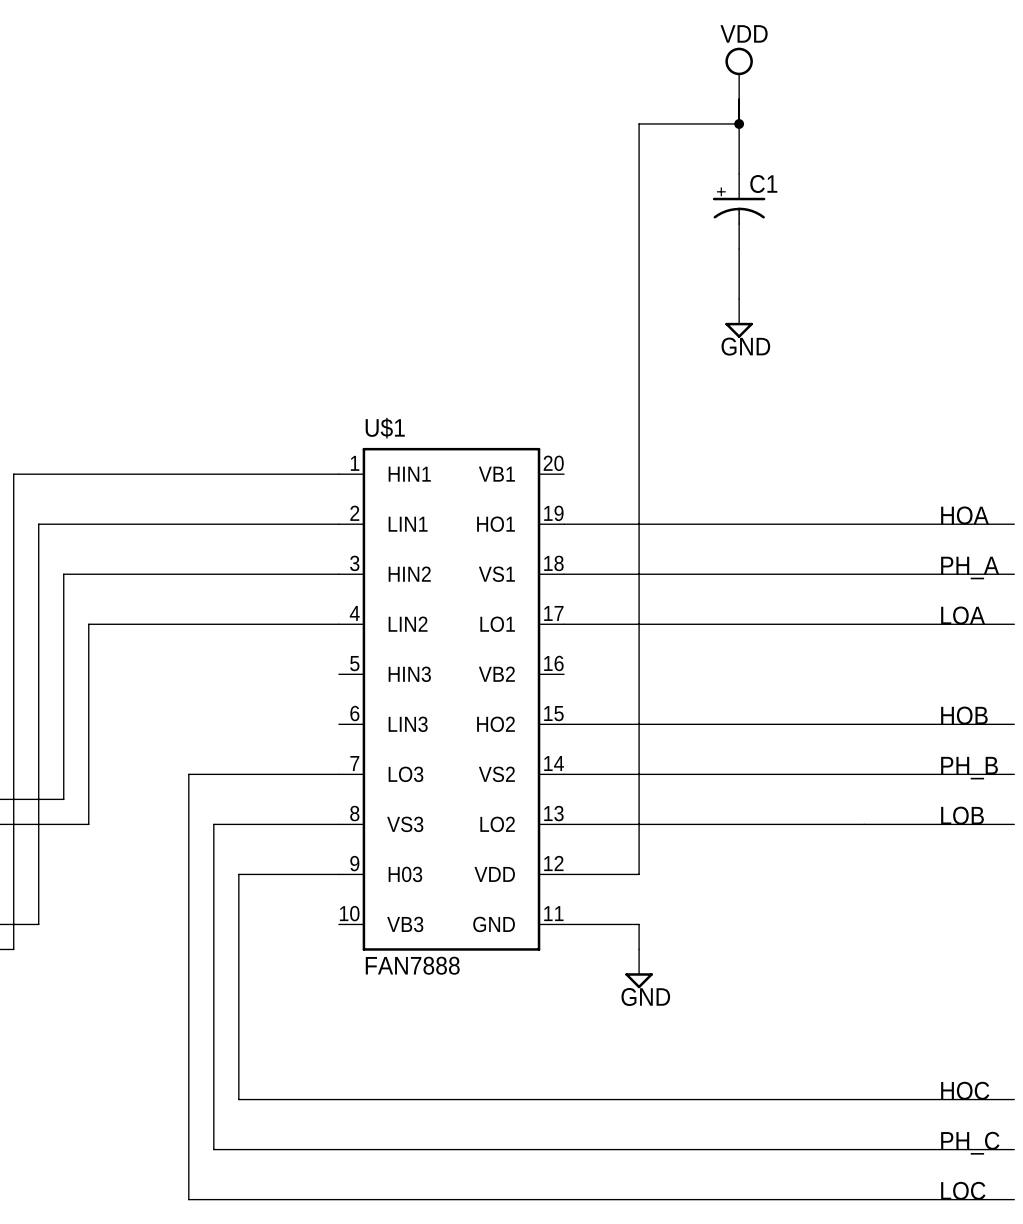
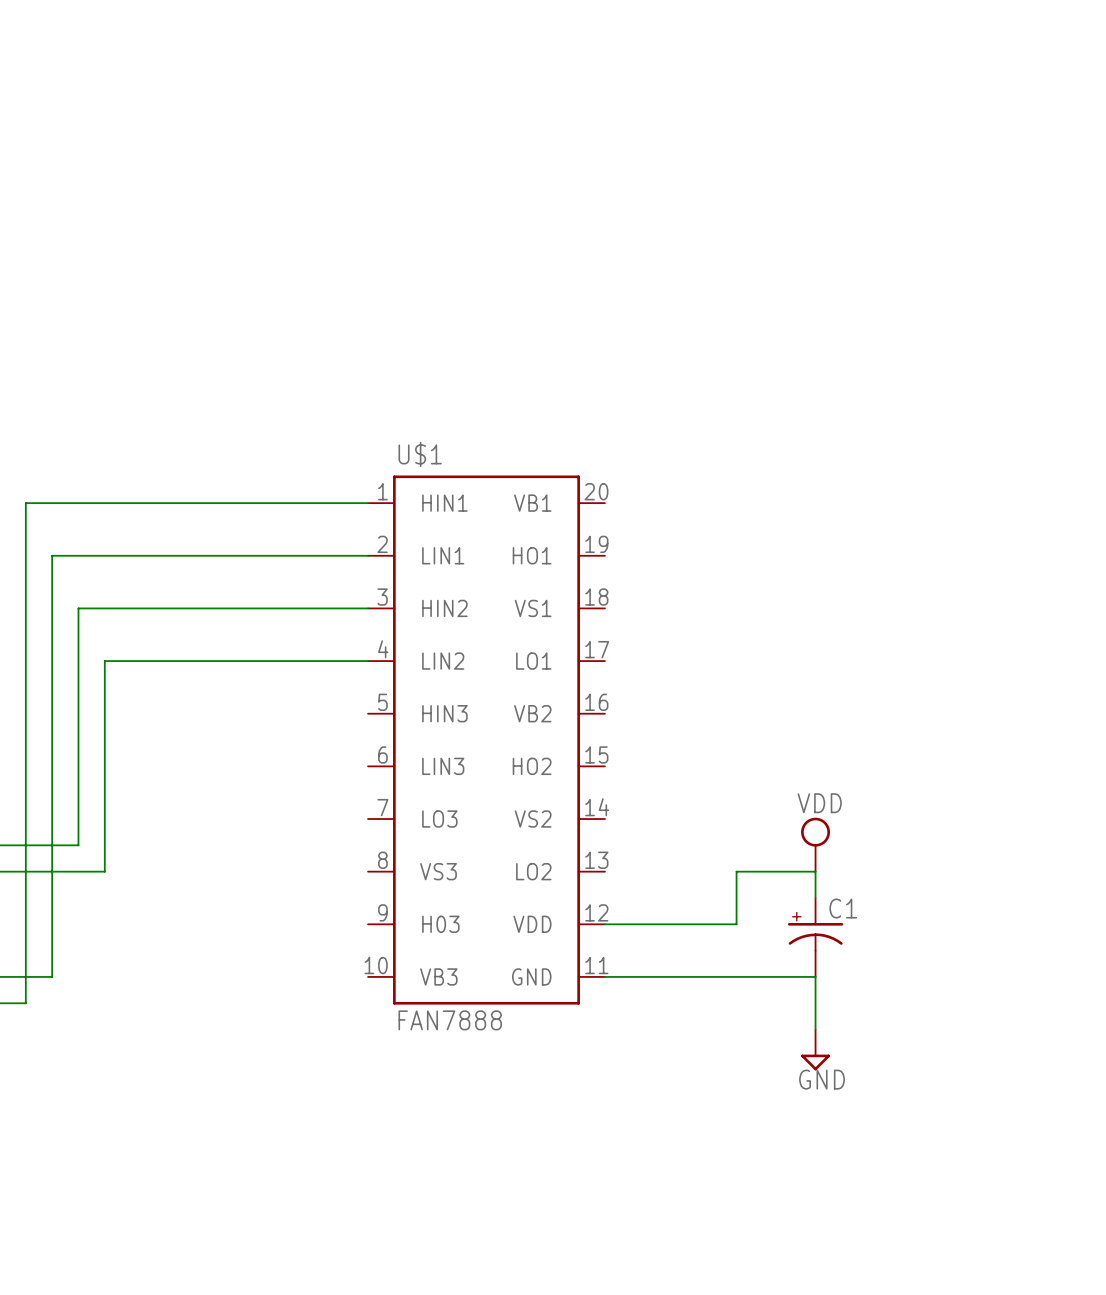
power symbol: VDD (739, 73) -> none
wire: (739, 98) (739, 174) -> none
wire: (739, 123) (639, 123) (639, 874) -> none
junction: (739, 123) -> none
C1 position: (739, 211) -> (815, 937)
wire: (739, 249) (739, 299) -> none
power symbol: GND (739, 318) -> none
label: HOA (964, 515) -> none
wire: (564, 524) (1014, 524) -> none
label: PH_A (970, 568) -> none
wire: (564, 574) (1014, 574) -> none
label: LOA (963, 615) -> none
wire: (564, 624) (1014, 624) -> none
label: HOB (964, 715) -> none
wire: (564, 724) (1014, 724) -> none
label: PH_B (969, 768) -> none
wire: (338, 774) (188, 774) (188, 1199) (1014, 1199) -> none
wire: (564, 774) (1014, 774) -> none
power symbol: none -> VDD (815, 844)
label: LOB (962, 815) -> none
wire: (338, 824) (213, 824) (213, 1149) (1014, 1149) -> none
wire: (564, 824) (689, 824) -> (683, 924) (736, 924) (736, 871)
wire: (764, 824) (1014, 824) -> (815, 871) (815, 897)
wire: (338, 874) (238, 874) (238, 1099) (1014, 1099) -> none
wire: (639, 924) (639, 949) -> (683, 976) (815, 976) (815, 1029)
power symbol position: GND (639, 968) -> GND (815, 1050)
label: HOC (965, 1090) -> none
label: PH_C (970, 1143) -> none
label: LOC (963, 1190) -> none

